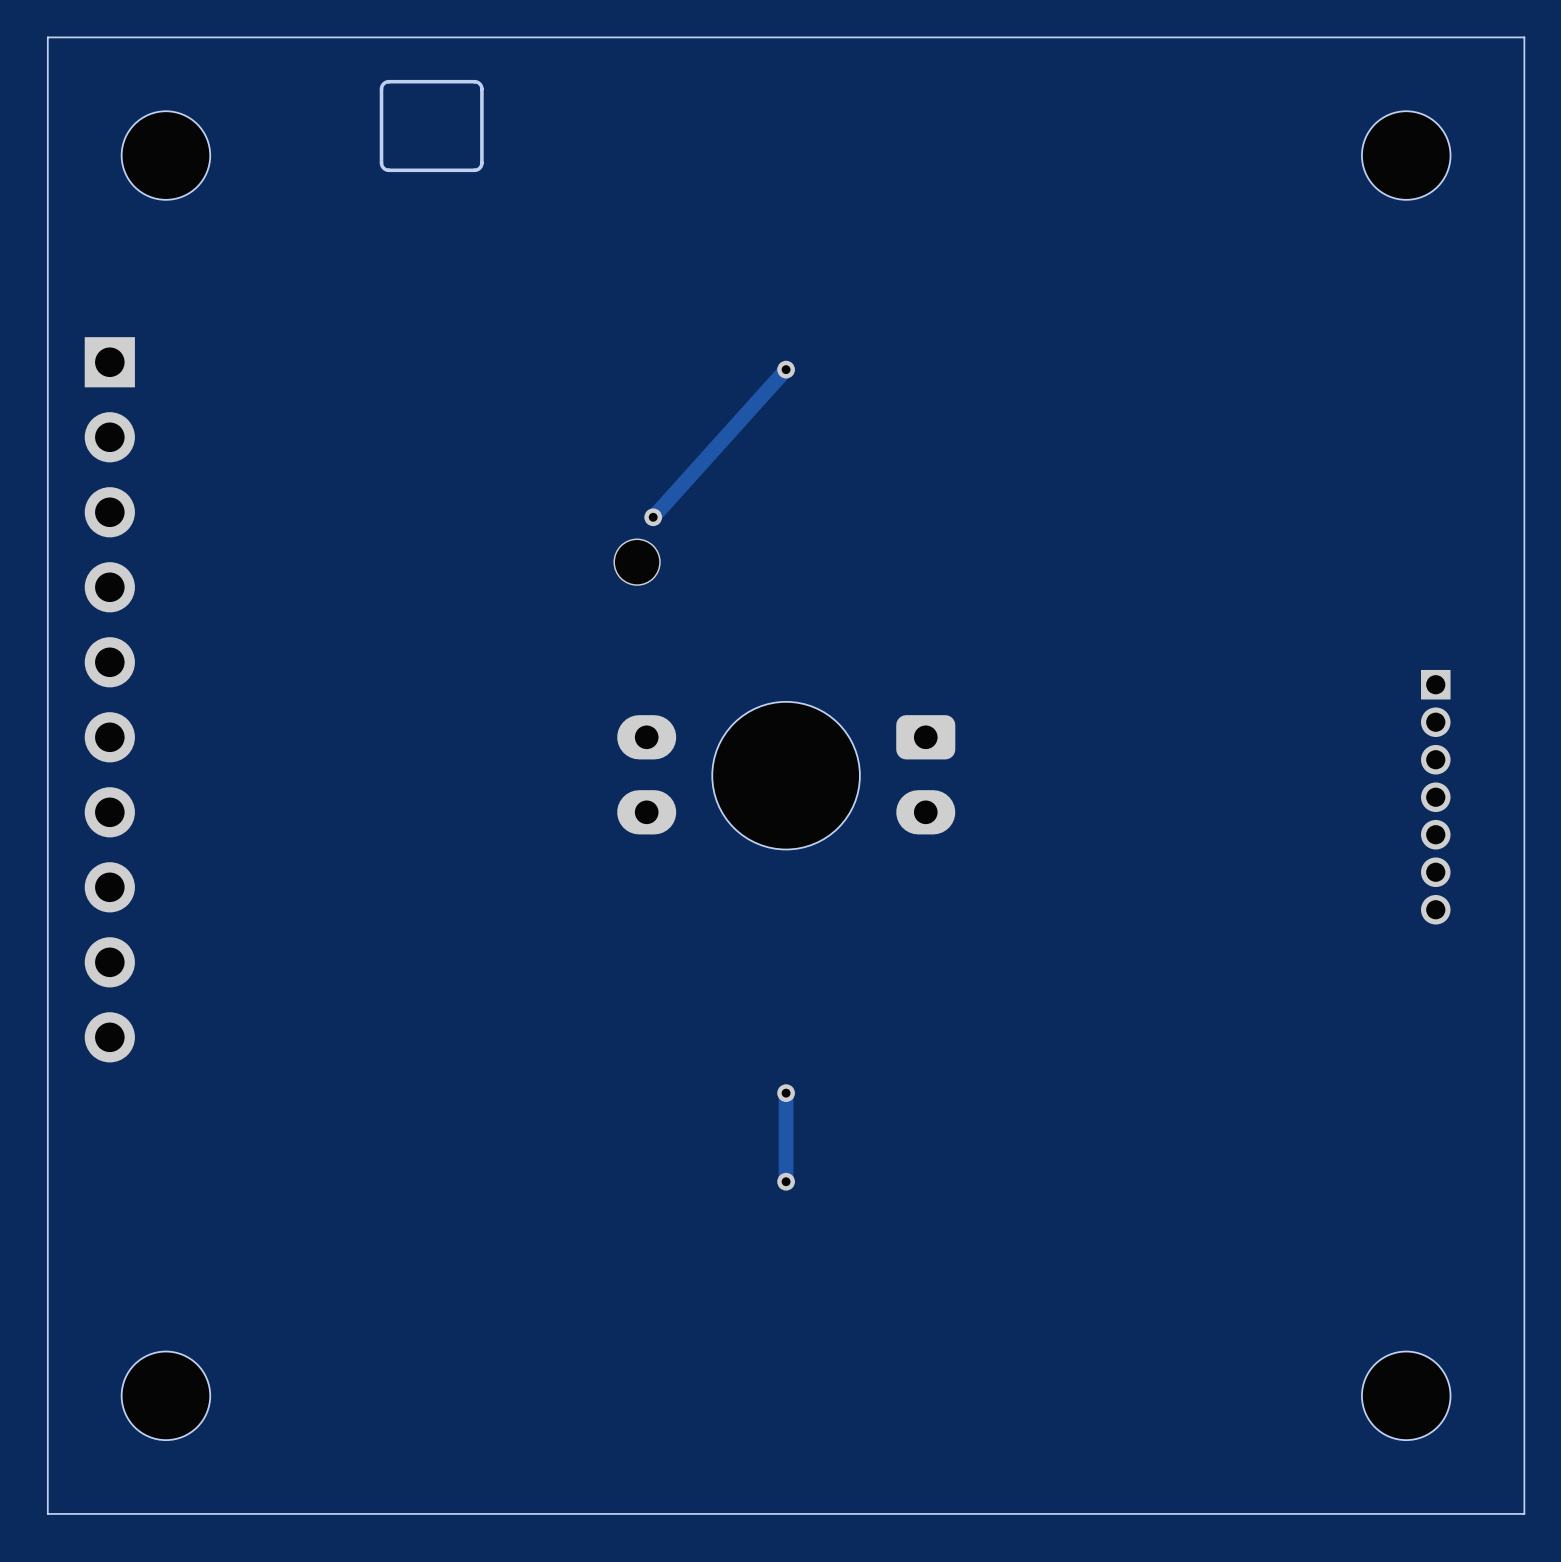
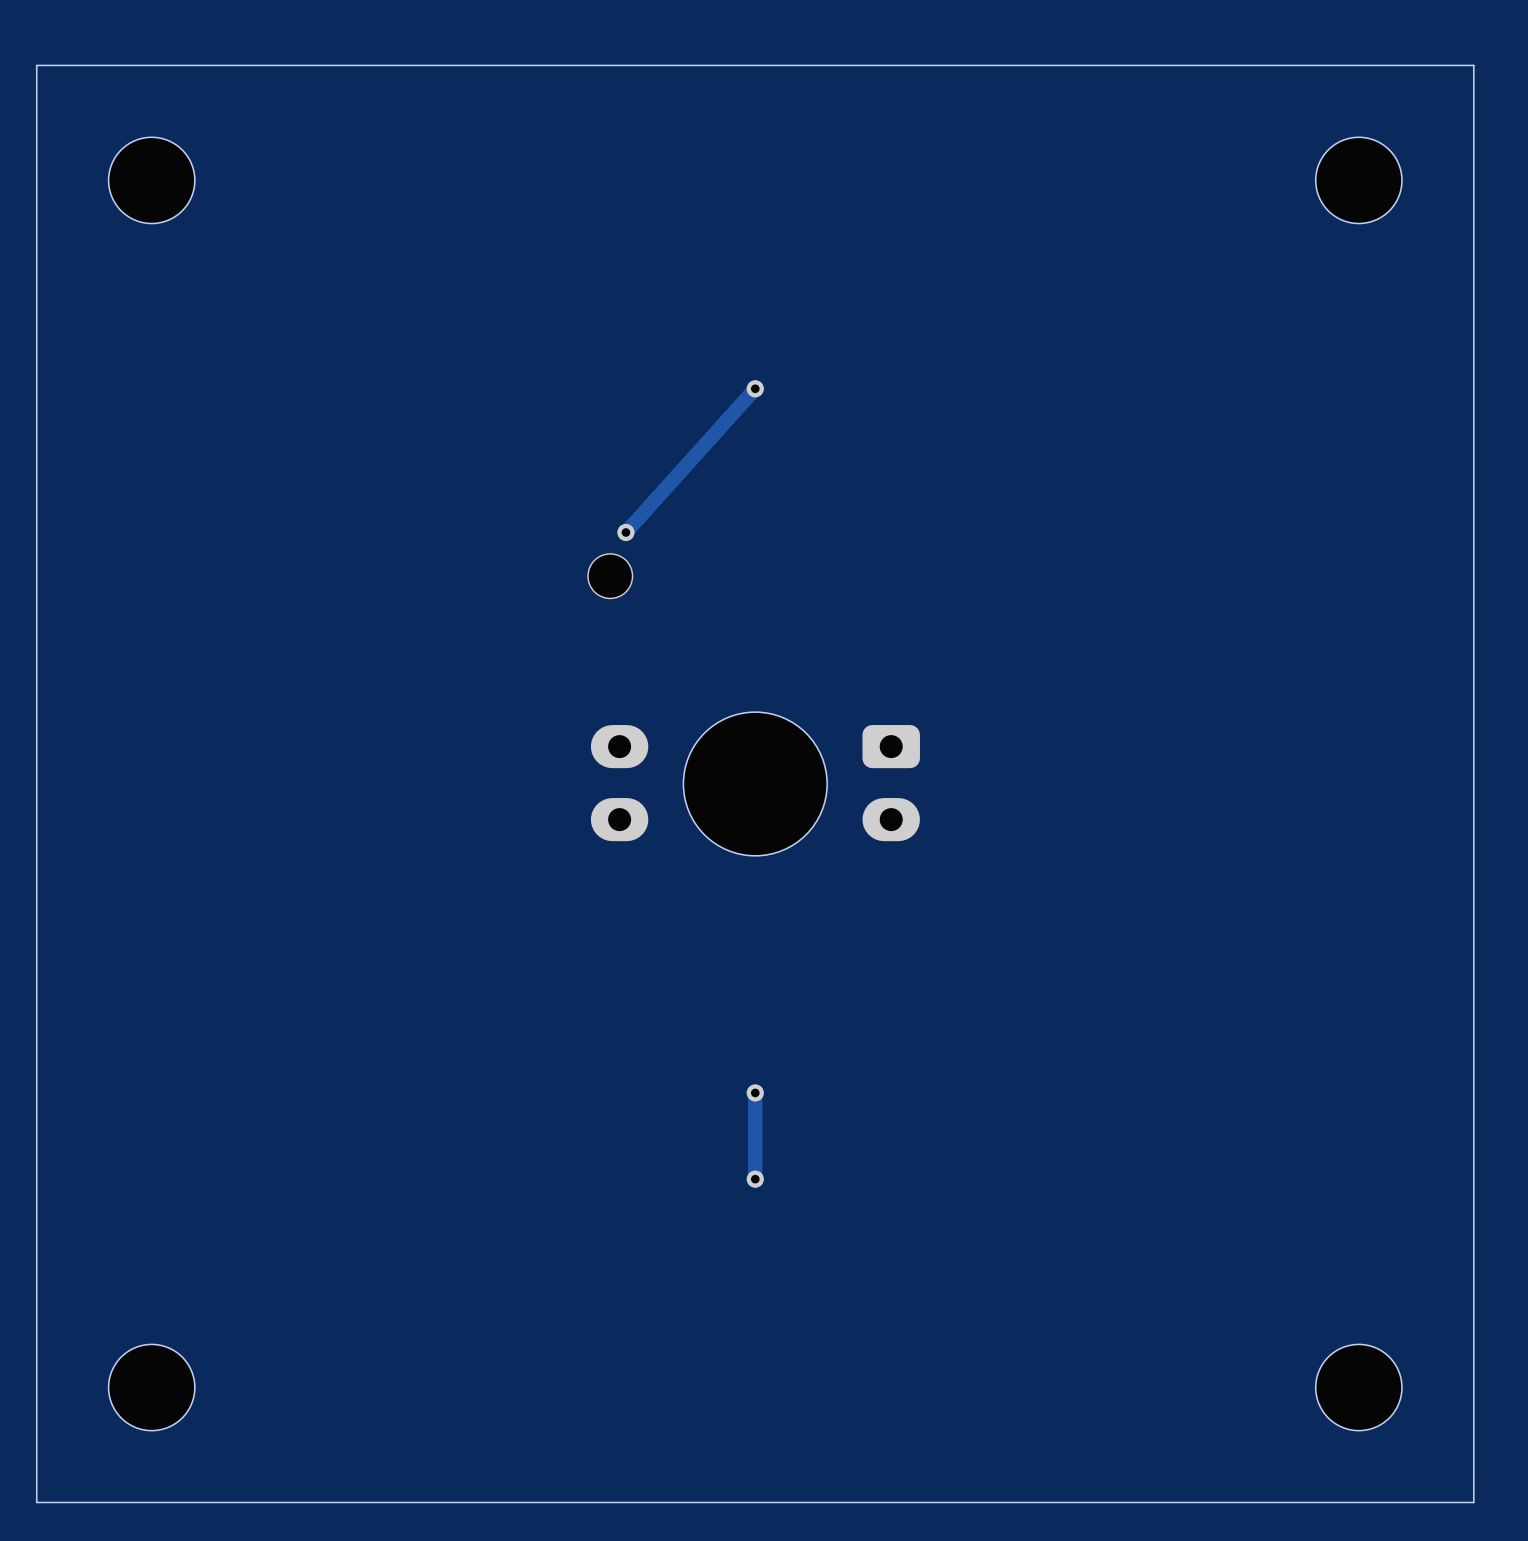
part: (431, 126) -> none
part: (109, 699) -> none
part: (1435, 797) -> none

